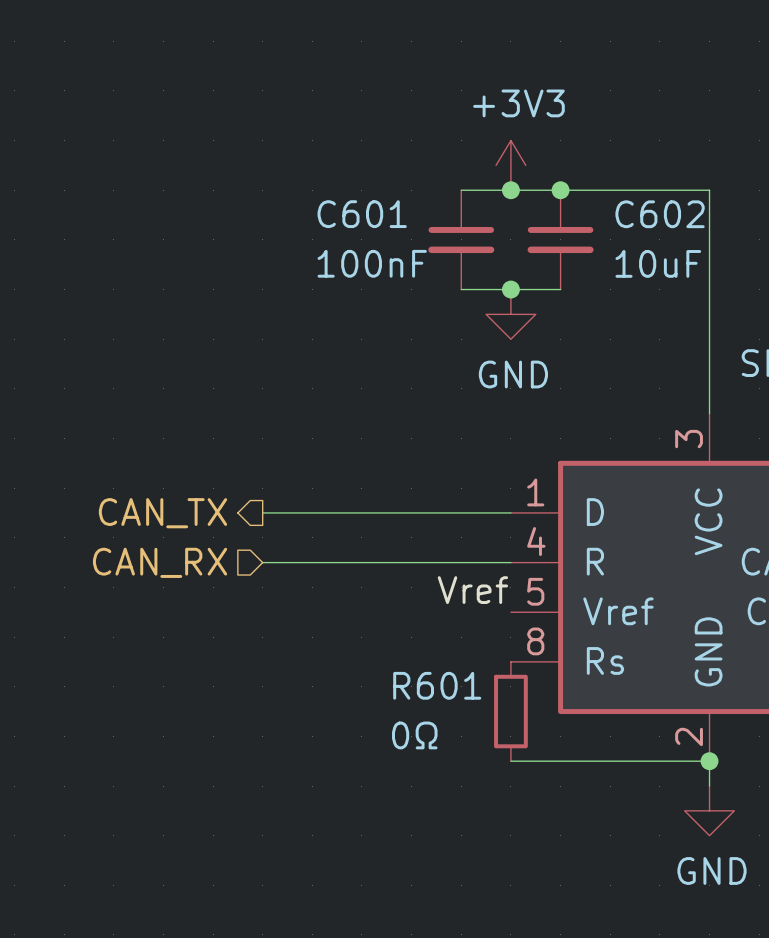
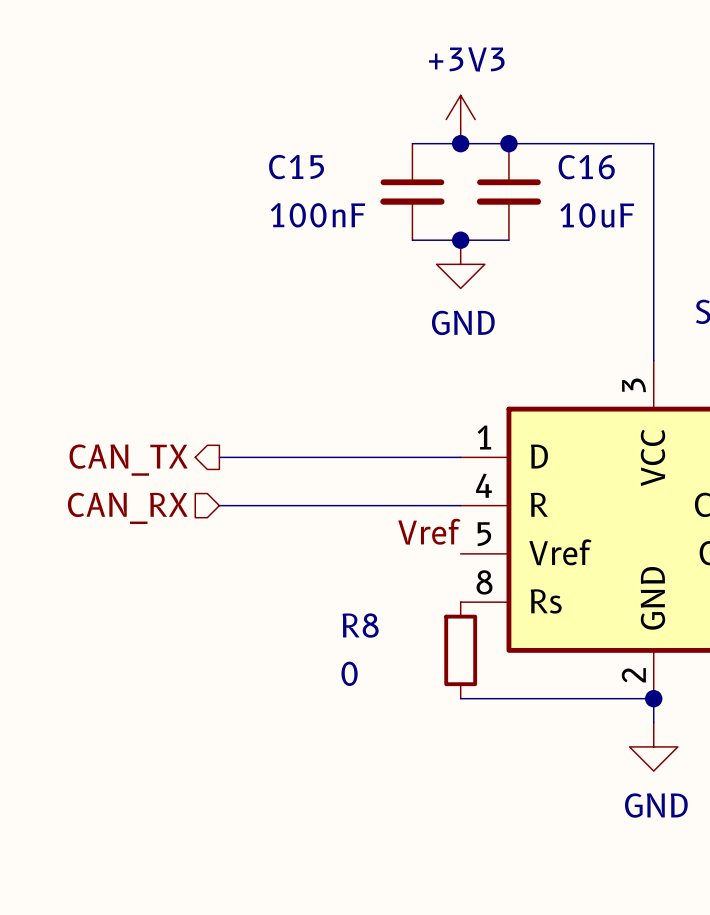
C601 name: C601 (362, 214) -> C15 (296, 167)
C602 name: C602 (660, 214) -> C16 (586, 167)
R601 name: R601 (437, 685) -> R8 (360, 625)
R601 value: 0Ω (414, 735) -> 0 (349, 673)

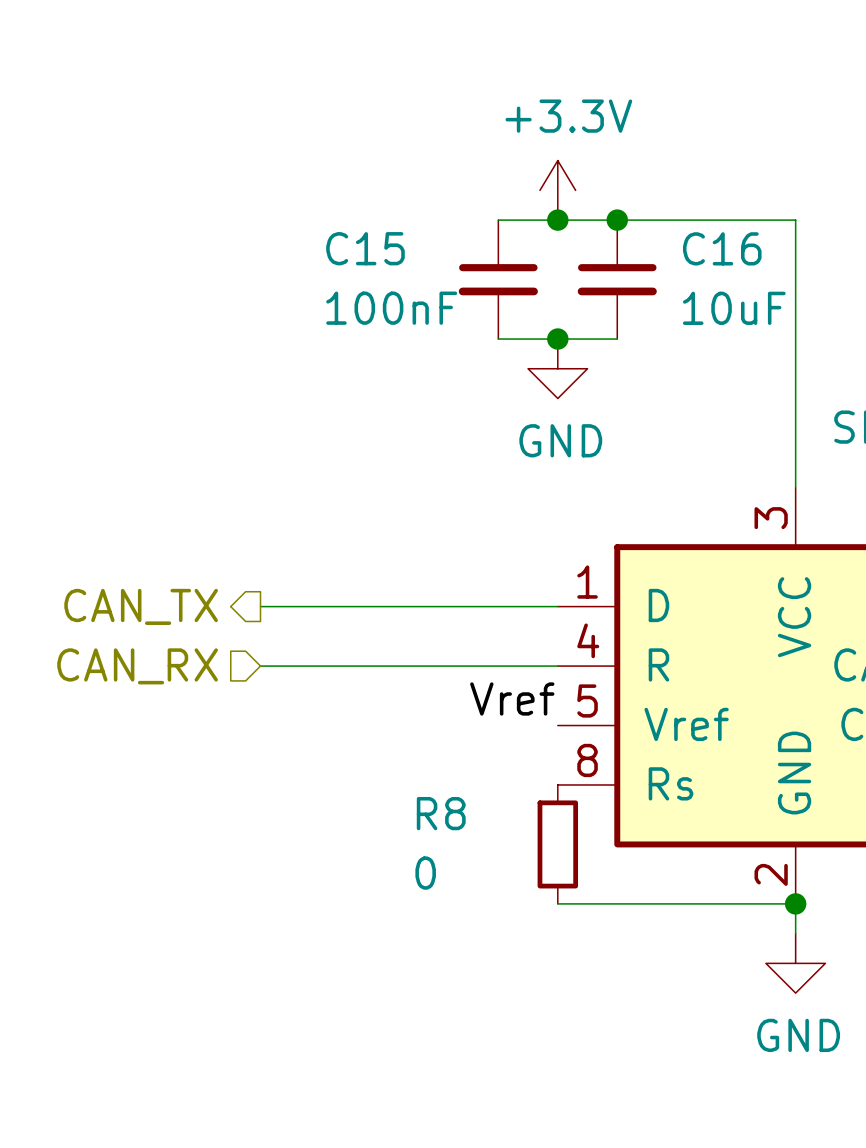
power symbol: +3V3 (460, 119) -> +3.3V (557, 190)

